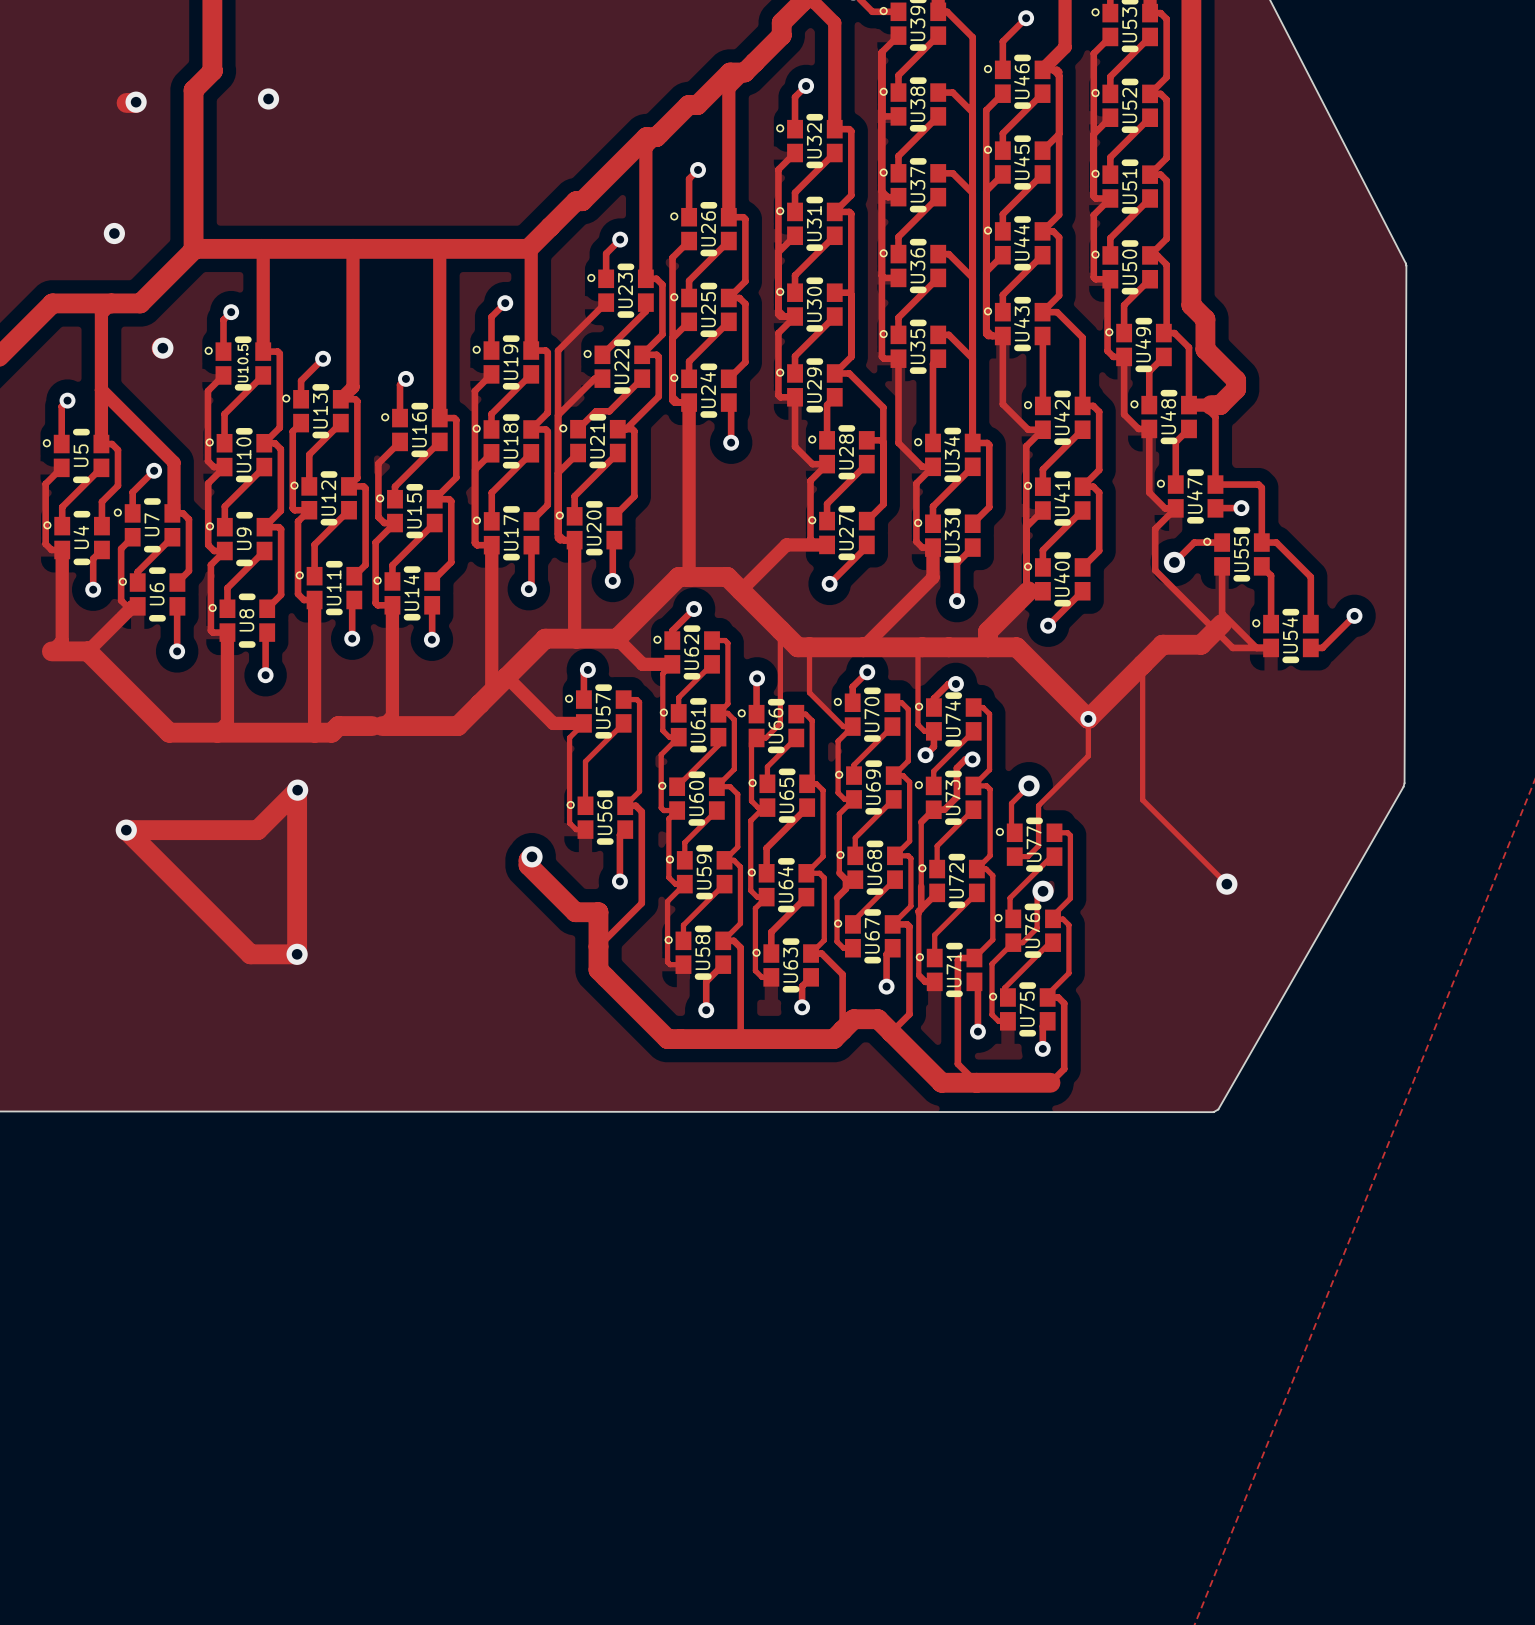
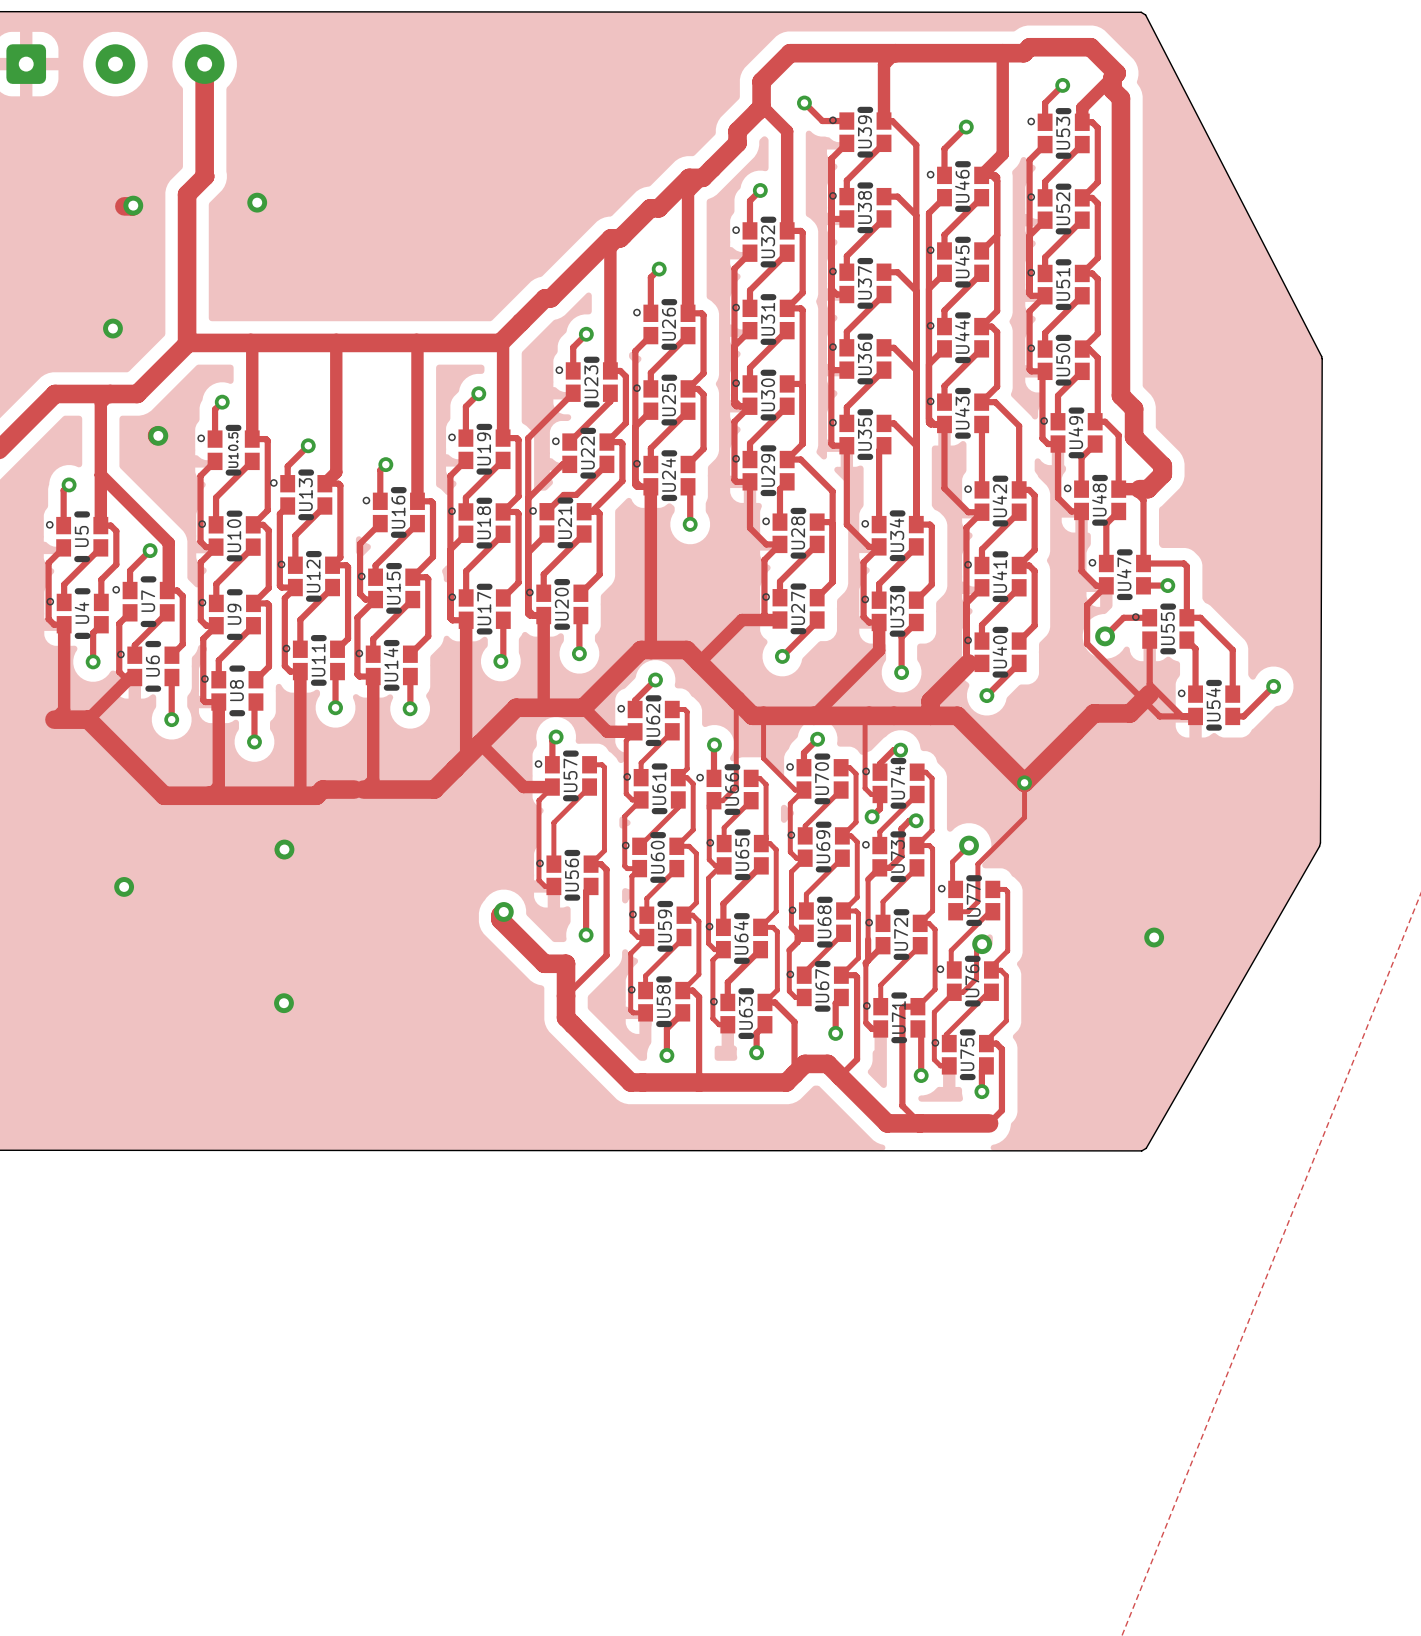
track: (1142, 664) (1142, 799) (1226, 884) -> none
track: (297, 790) (257, 830) (126, 830) (250, 954) (297, 954) (297, 790) -> none

